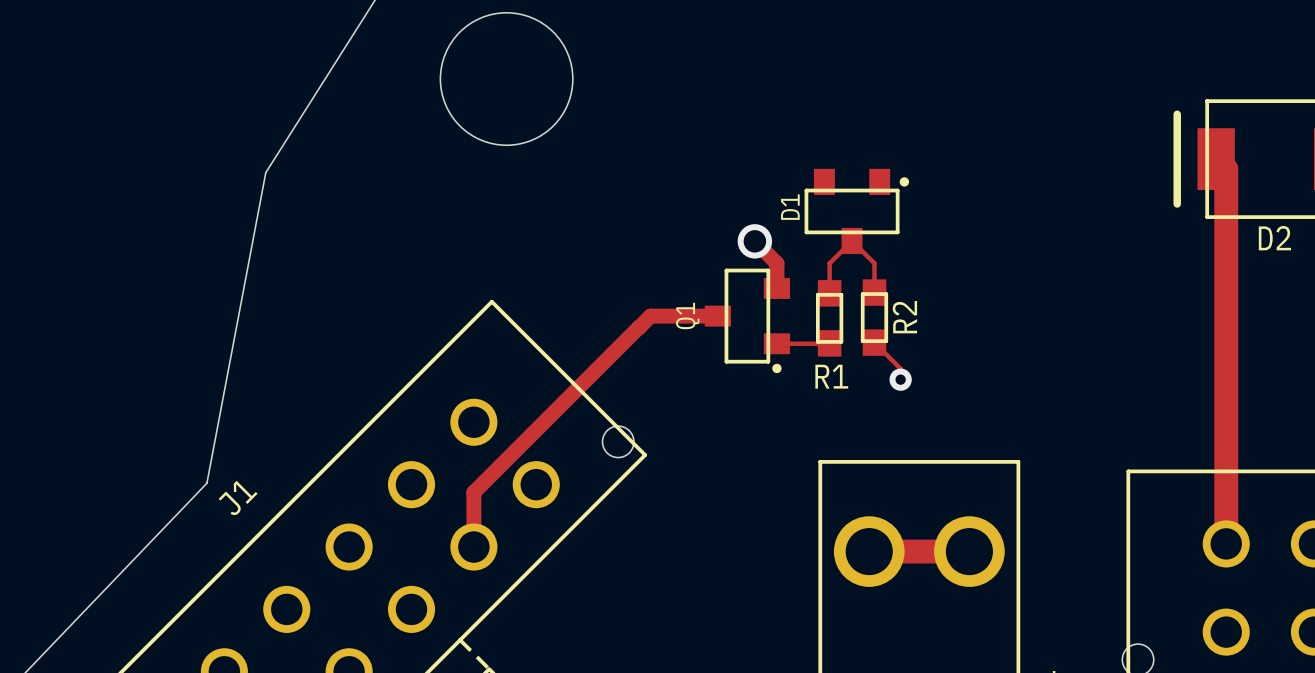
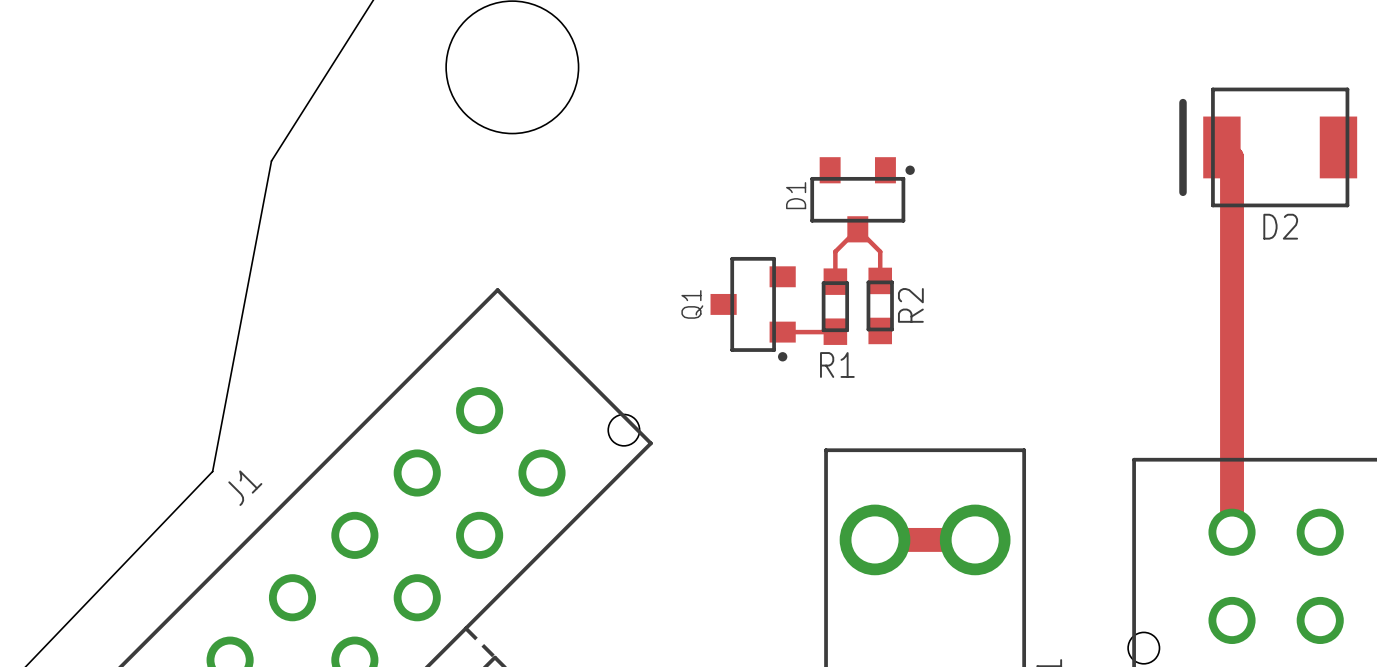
top track: (754, 241) (776, 263) (776, 288) -> none
via: (754, 241) -> none
top track: (717, 316) (650, 316) (639, 327) -> none
top track: (639, 327) (473, 492) (473, 547) -> none
top track: (874, 342) (900, 368) (900, 379) -> none
via: (900, 379) -> none

